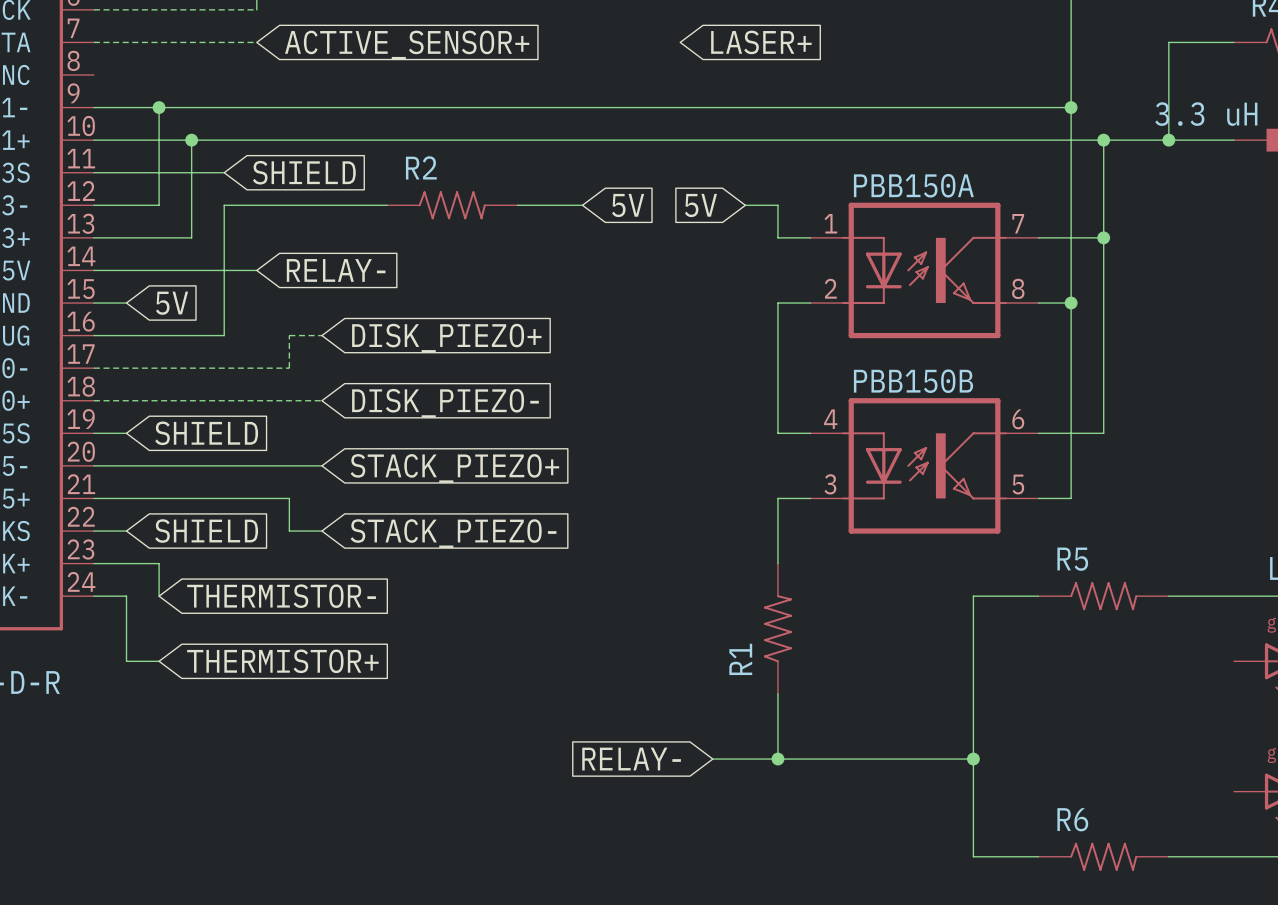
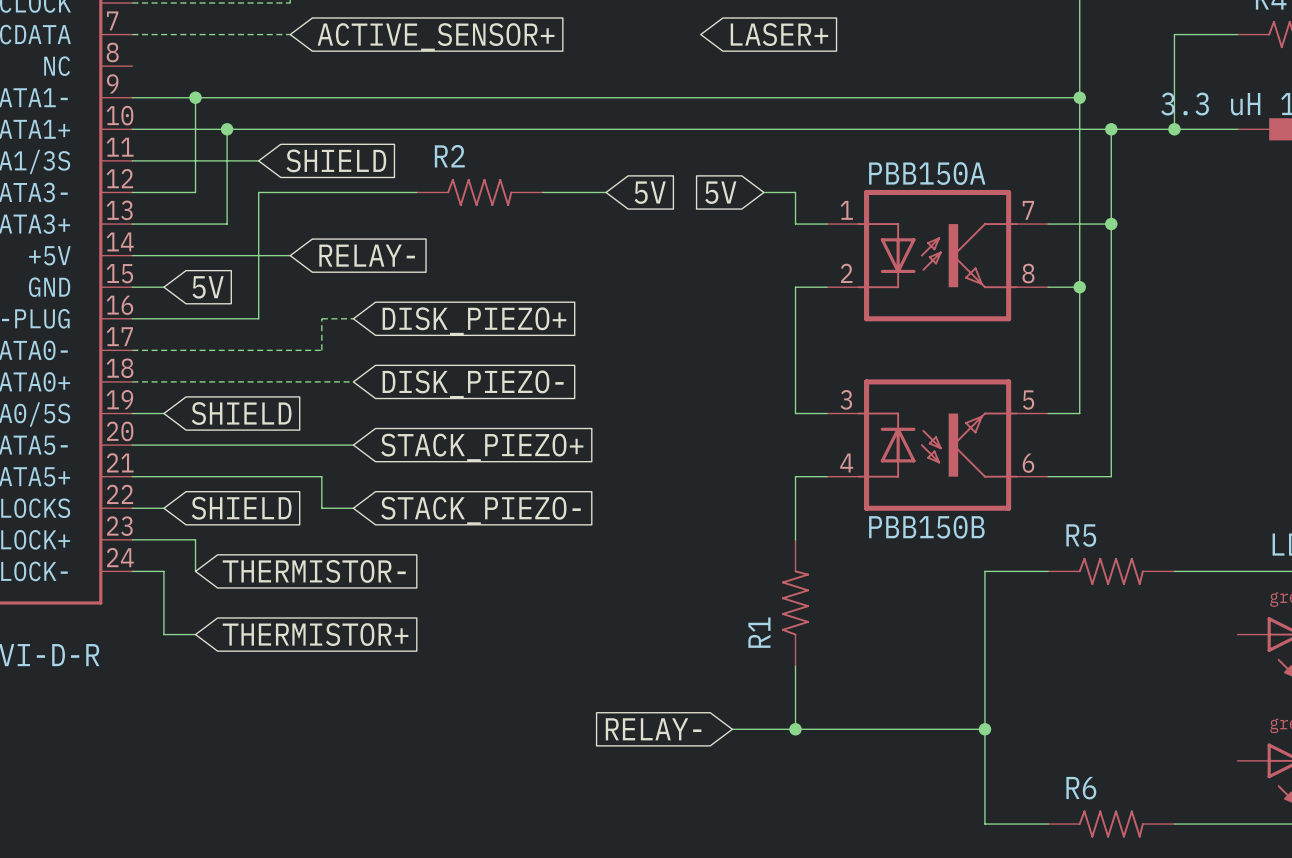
wire: (1103, 433) (1071, 433) (1071, 498) -> (1111, 413) (1111, 476) (1079, 476)
PBB150B flip: as is (924, 465) -> up-down (937, 445)

